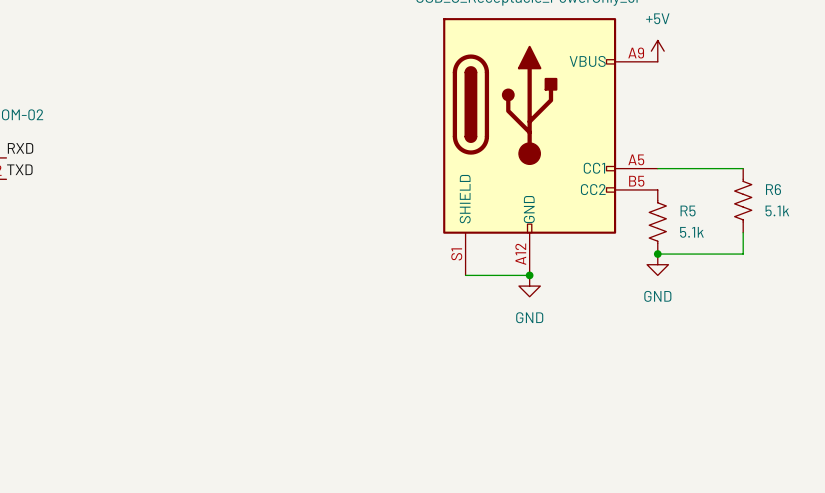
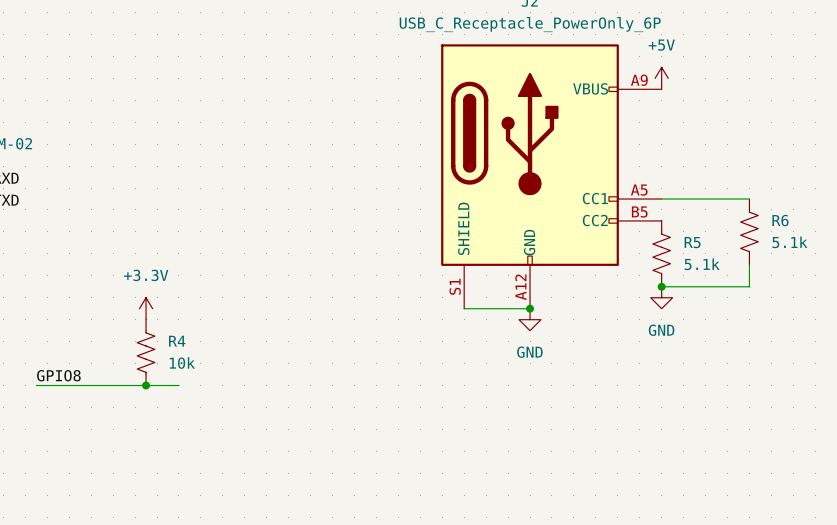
power symbol: none -> +3.3V (146, 308)
R4: none -> 10k (146, 352)
label: none -> GPIO8 (58, 375)
wire: none -> (36, 385) (178, 385)
junction: none -> (146, 385)

